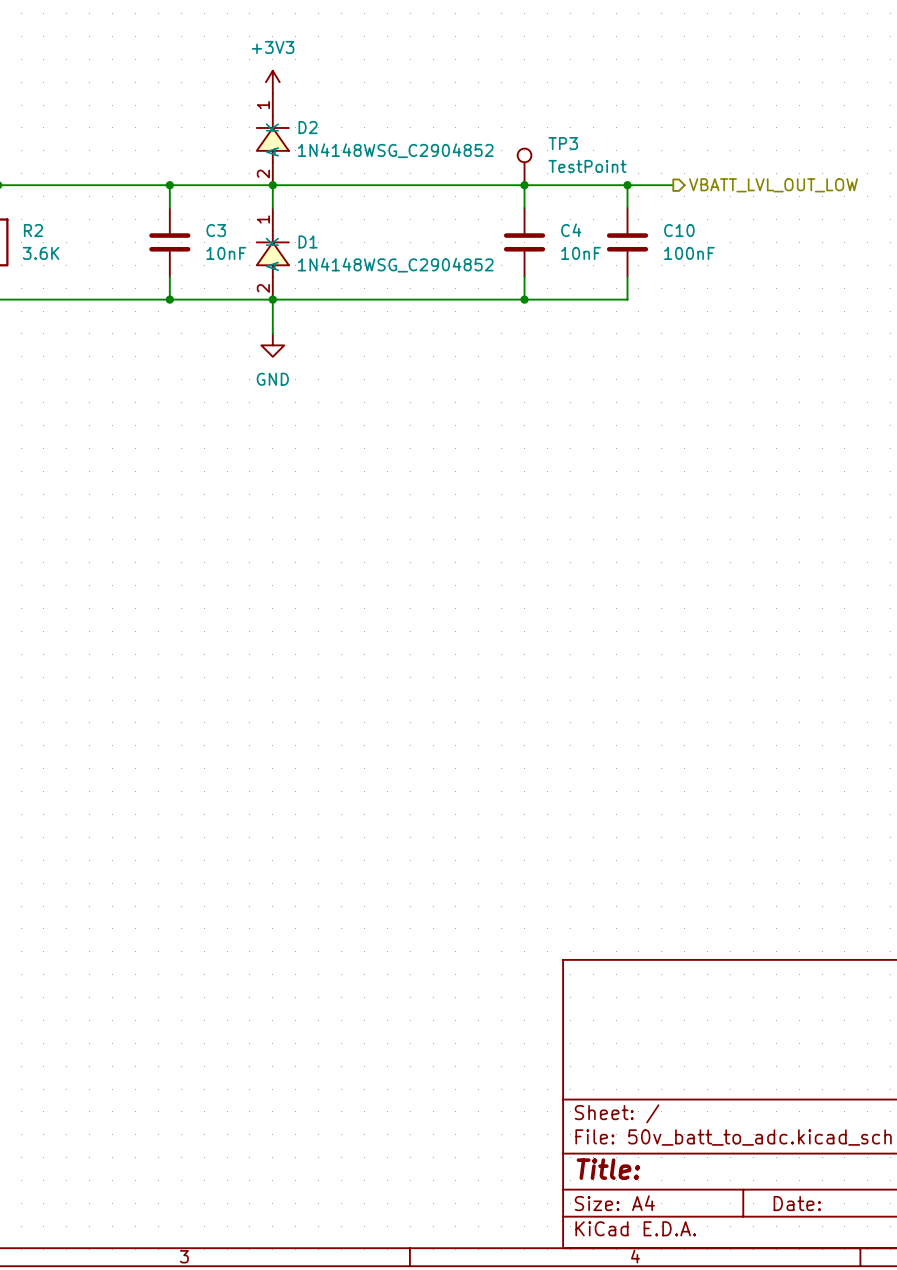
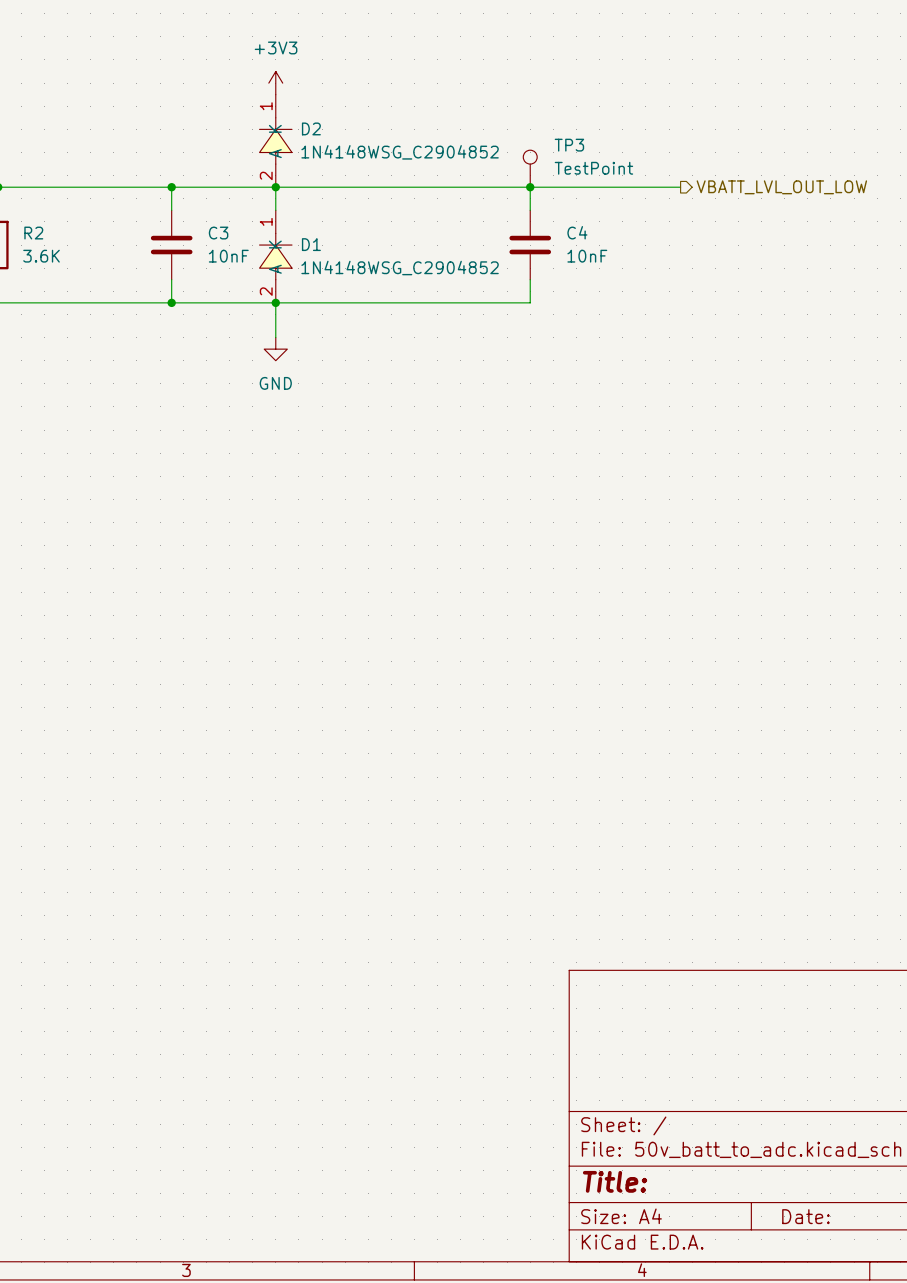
wire: (627, 185) (627, 208) -> none
junction: (627, 185) -> none
C10: 100nF (627, 242) -> none
wire: (627, 276) (627, 299) (524, 299) -> none
junction: (524, 299) -> none

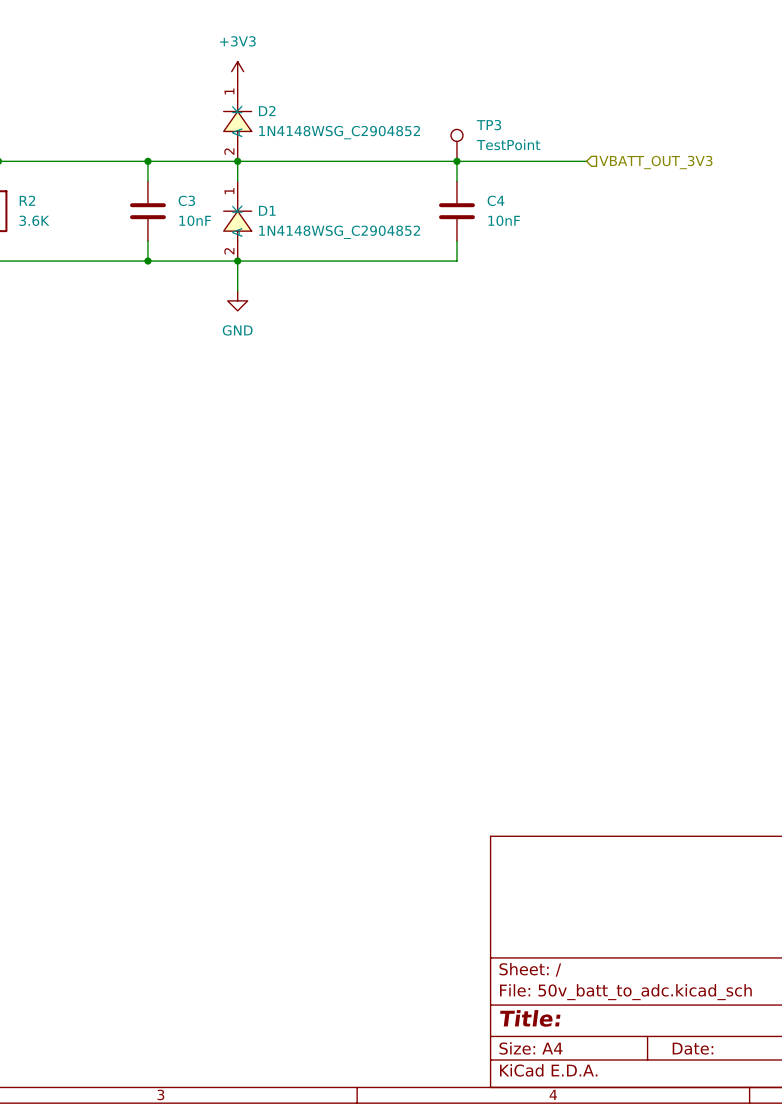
hierarchical label shape: output (781, 187) -> input (655, 162)
hierarchical label: VBATT_LVL_OUT_LOW (781, 187) -> VBATT_OUT_3V3 (655, 162)

